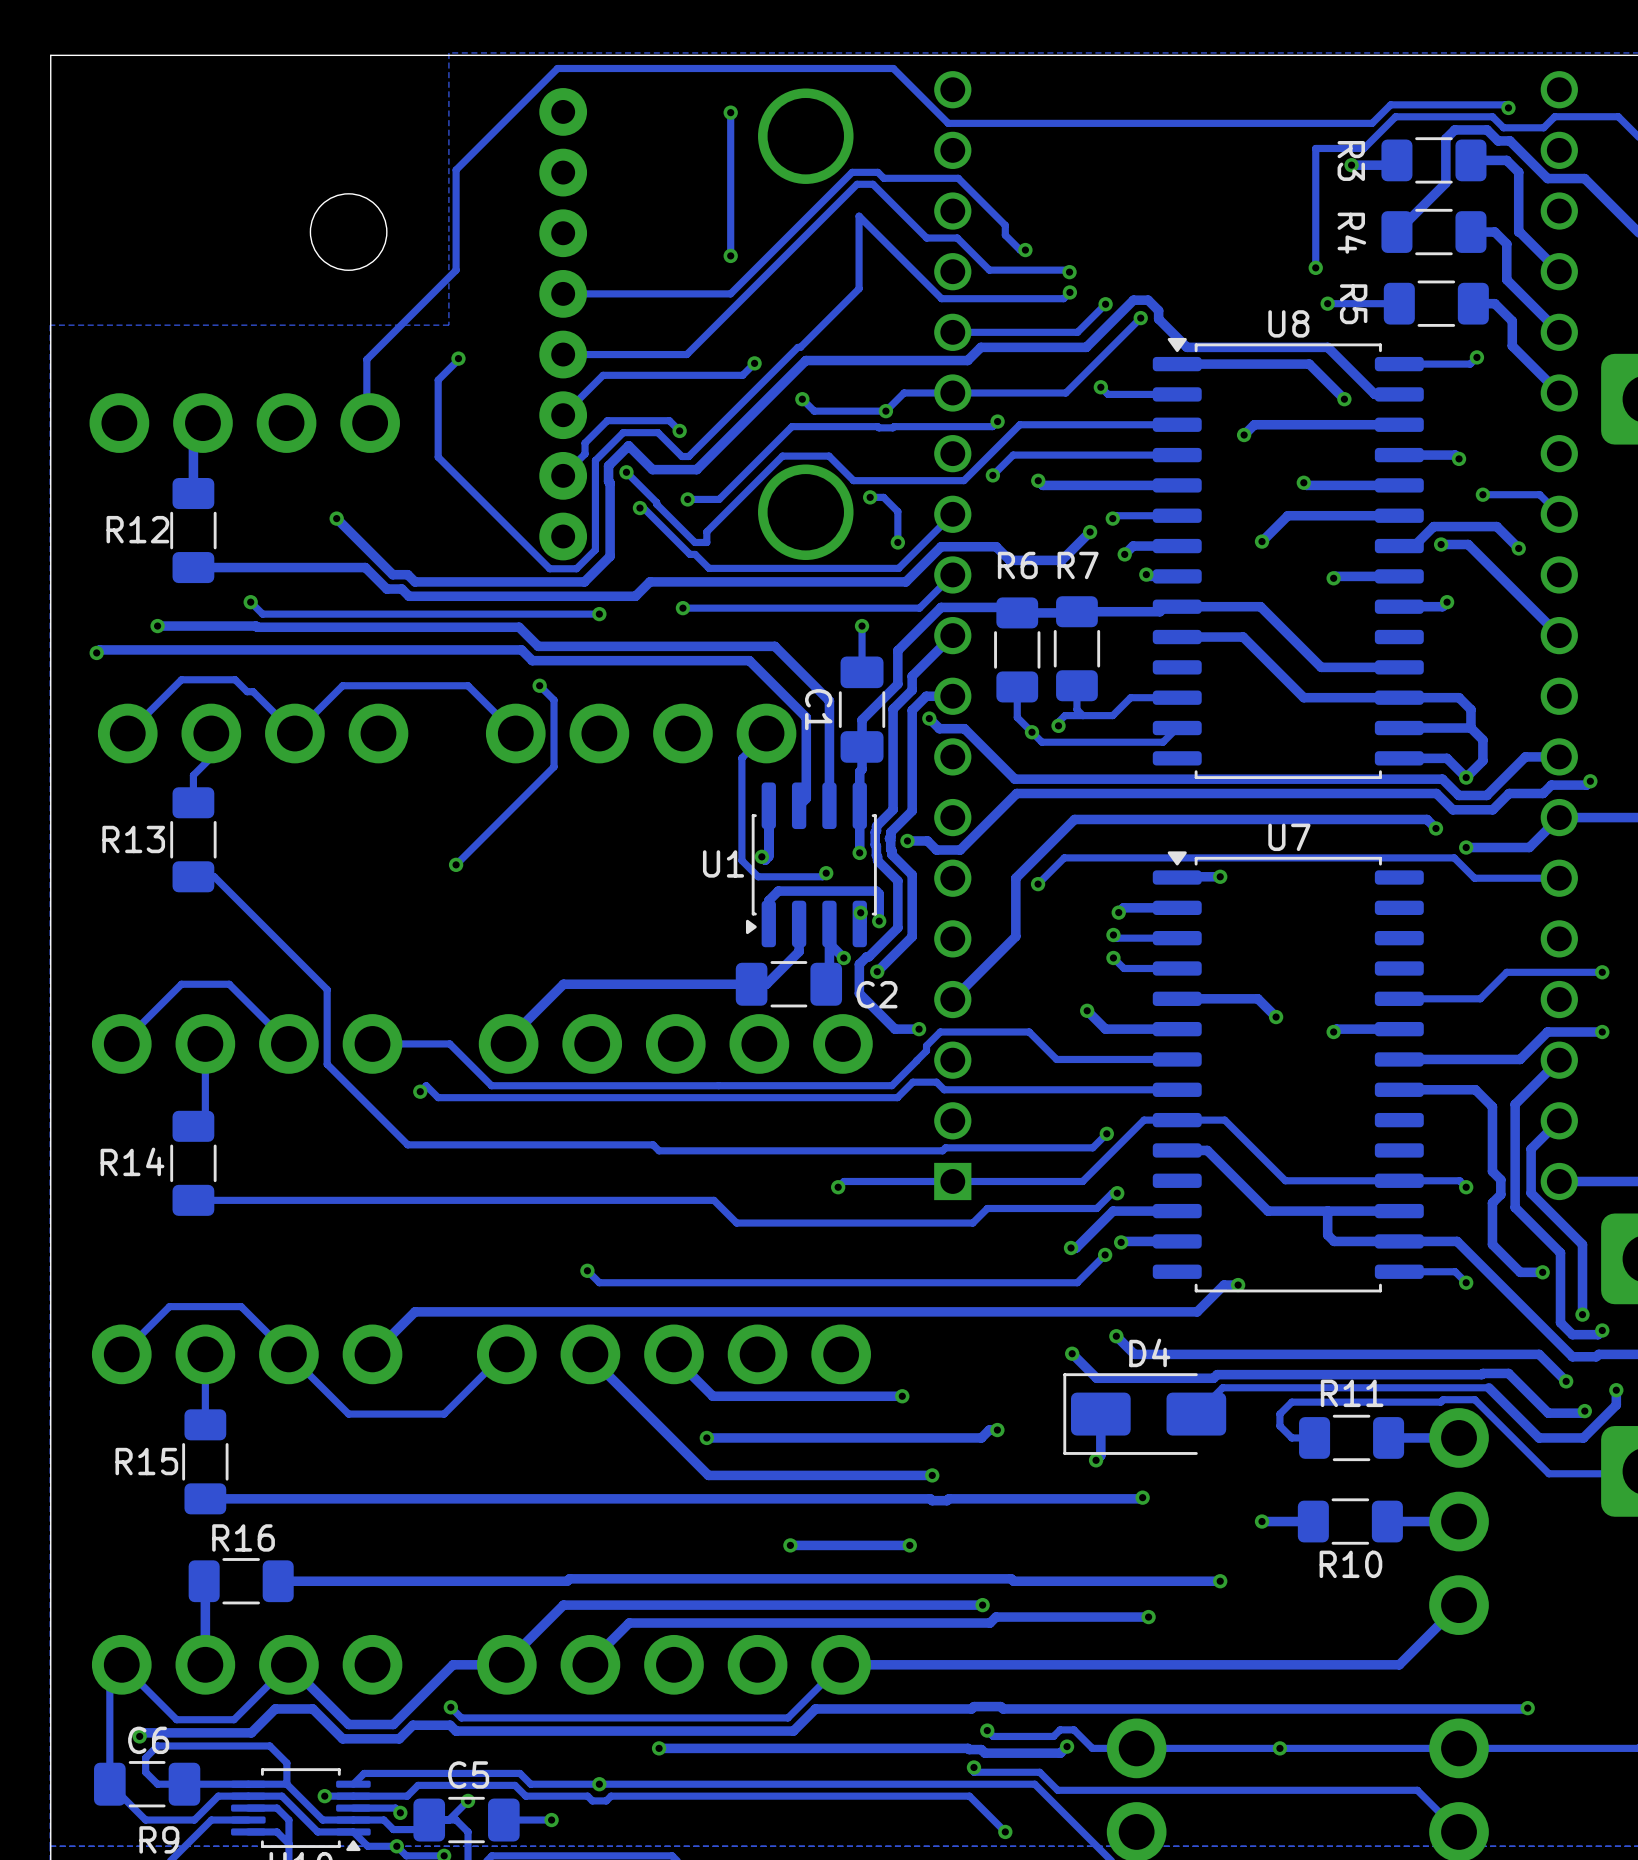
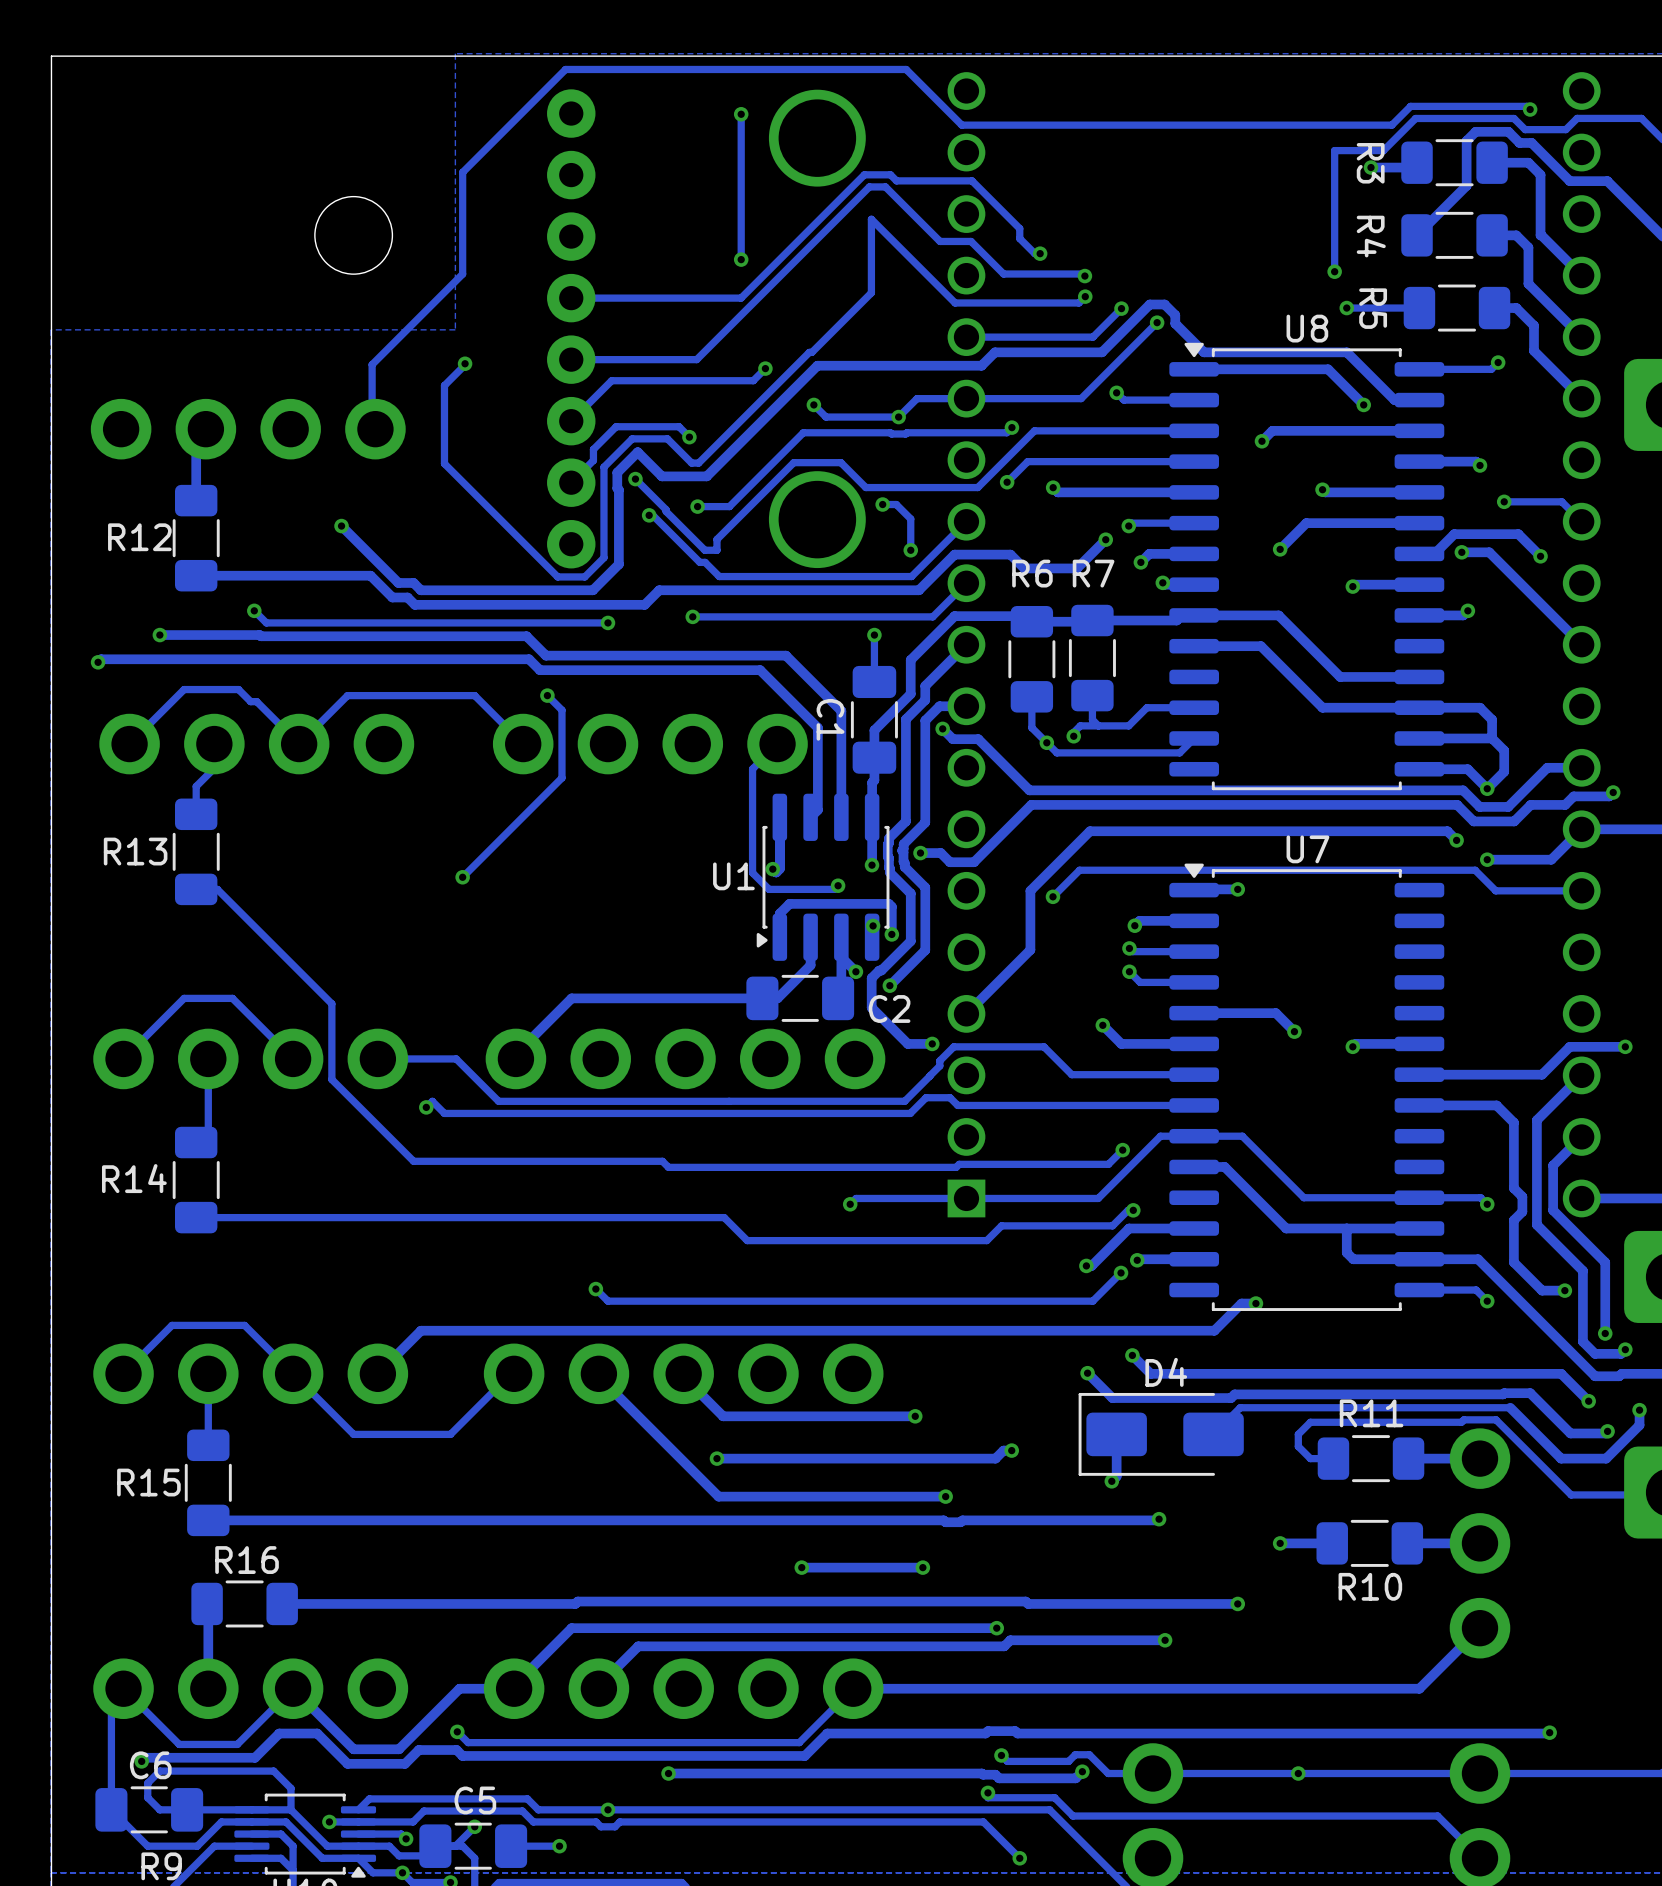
track: (1602, 972) (1506, 972) (1480, 998) (1399, 998) -> none
via: (1602, 972) -> none

